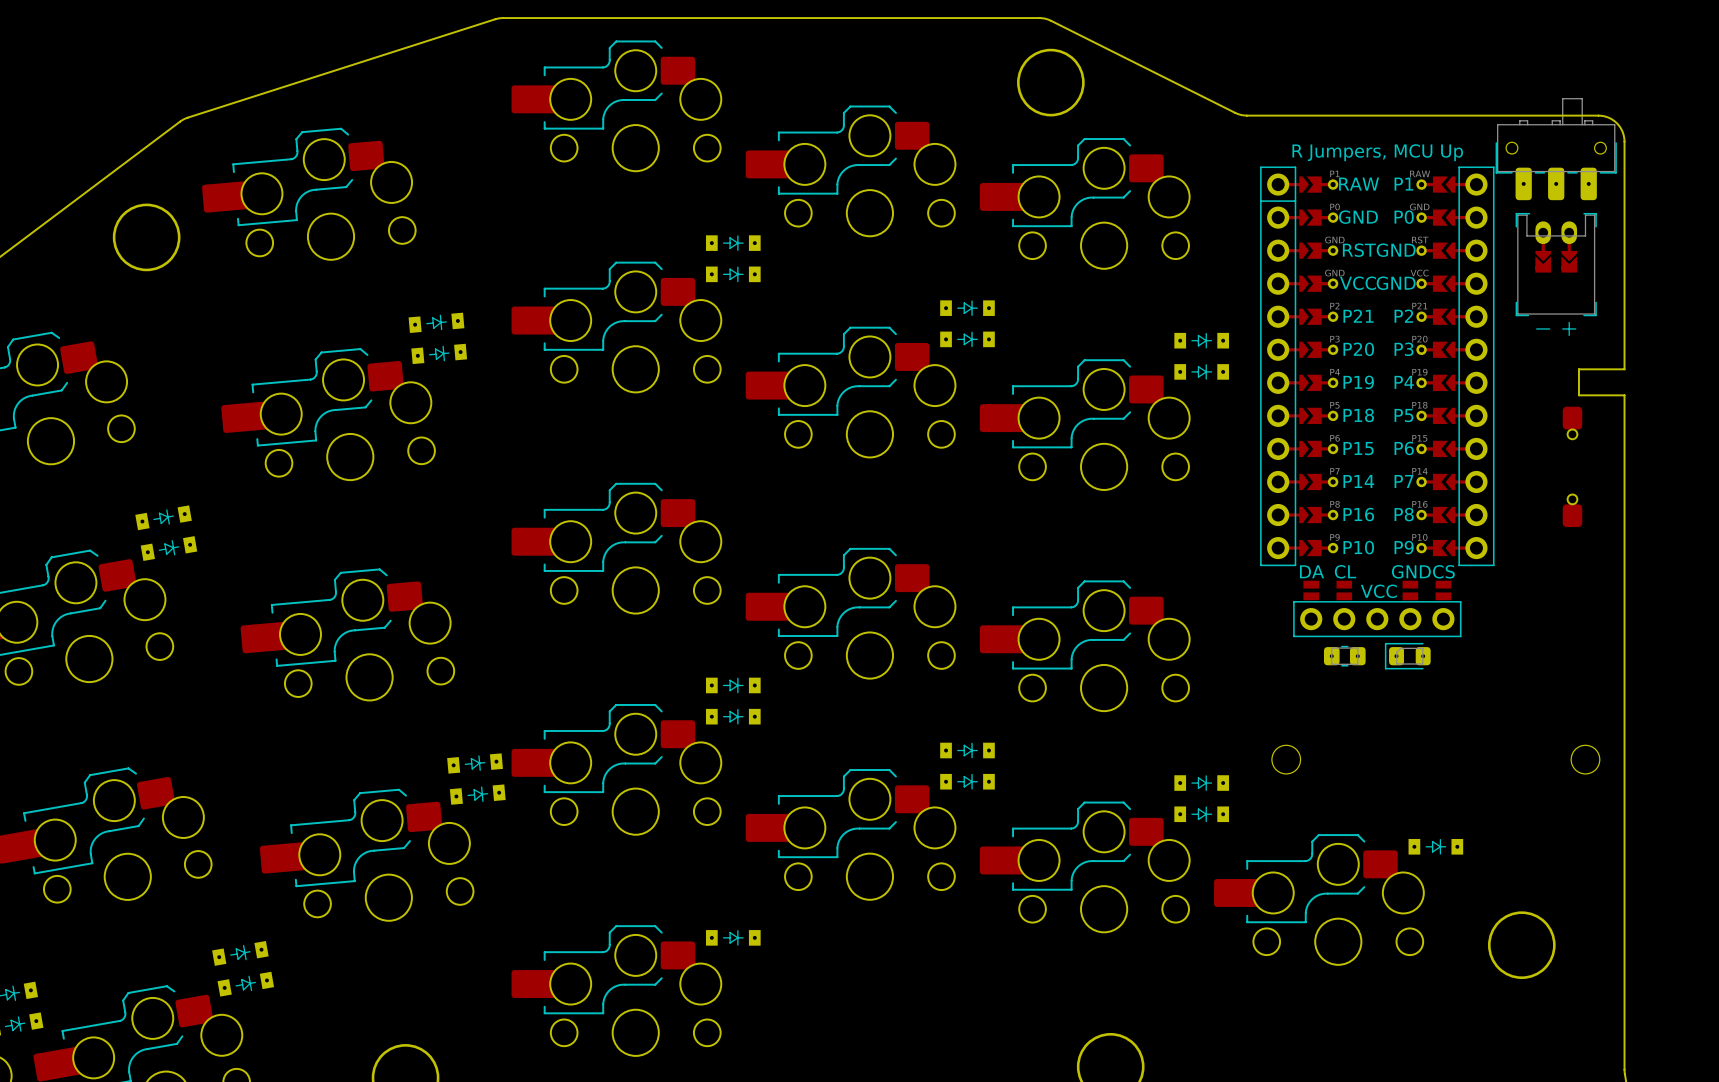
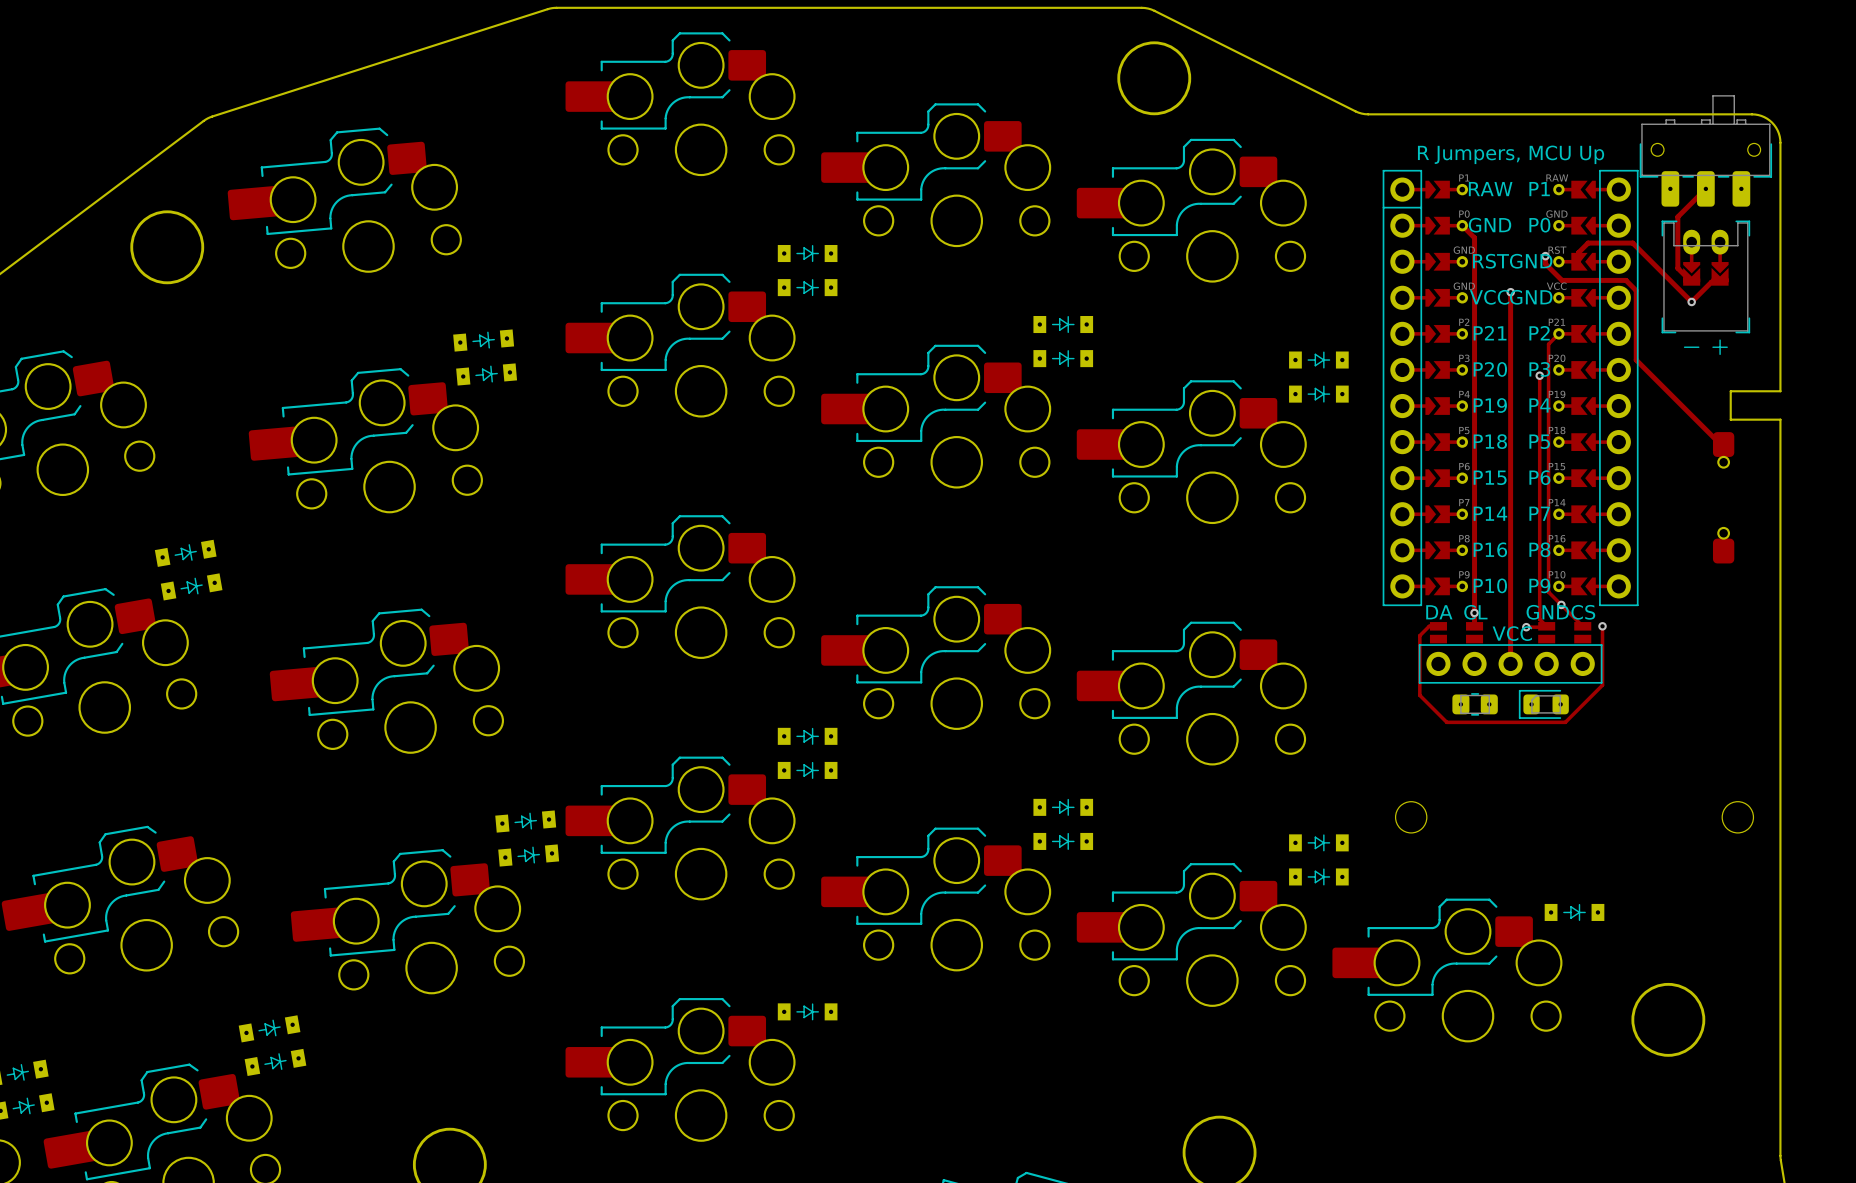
track: none -> (1705, 188) (1677, 216) (1677, 268) (1691, 282)
track: none -> (1462, 225) (1474, 237) (1474, 626)
track: none -> (1545, 256) (1545, 263) (1562, 280) (1626, 280) (1636, 290) (1636, 360) (1720, 444) (1723, 444)
via: none -> (1545, 256)
track: none -> (1578, 261) (1578, 252) (1588, 243) (1632, 243) (1691, 301) (1711, 282) (1720, 282)
track: none -> (1510, 292) (1510, 663) (1507, 664)
via: none -> (1510, 292)
via: none -> (1691, 301)
track: none -> (1558, 333) (1548, 344) (1548, 592) (1582, 626)
track: none -> (1539, 375) (1539, 619) (1546, 626) (1526, 627)
via: none -> (1539, 375)
via: none -> (1561, 604)
via: none -> (1474, 612)
track: none -> (1438, 626) (1429, 626) (1419, 635) (1419, 695) (1446, 722) (1565, 722) (1602, 685) (1602, 626)
via: none -> (1602, 626)
via: none -> (1526, 627)

